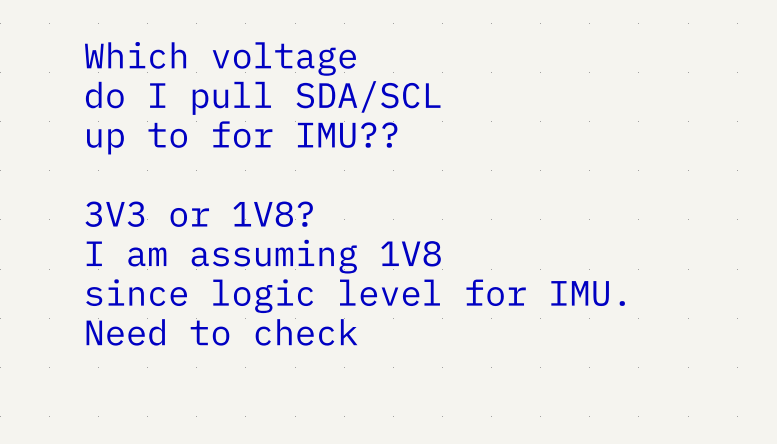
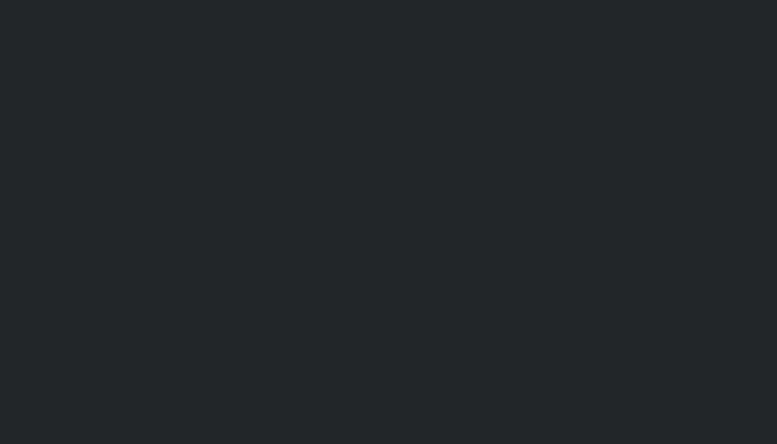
text: Which voltage (220, 58) -> none
text: do I pull SDA/SCL (263, 98) -> none
text: up to for IMU?? (242, 137) -> none
text: 3V3 or 1V8? (199, 214) -> none
text: I am assuming 1V8 (263, 256) -> none
text: since logic level for IMU. (355, 296) -> none
text: Need to check (221, 332) -> none

